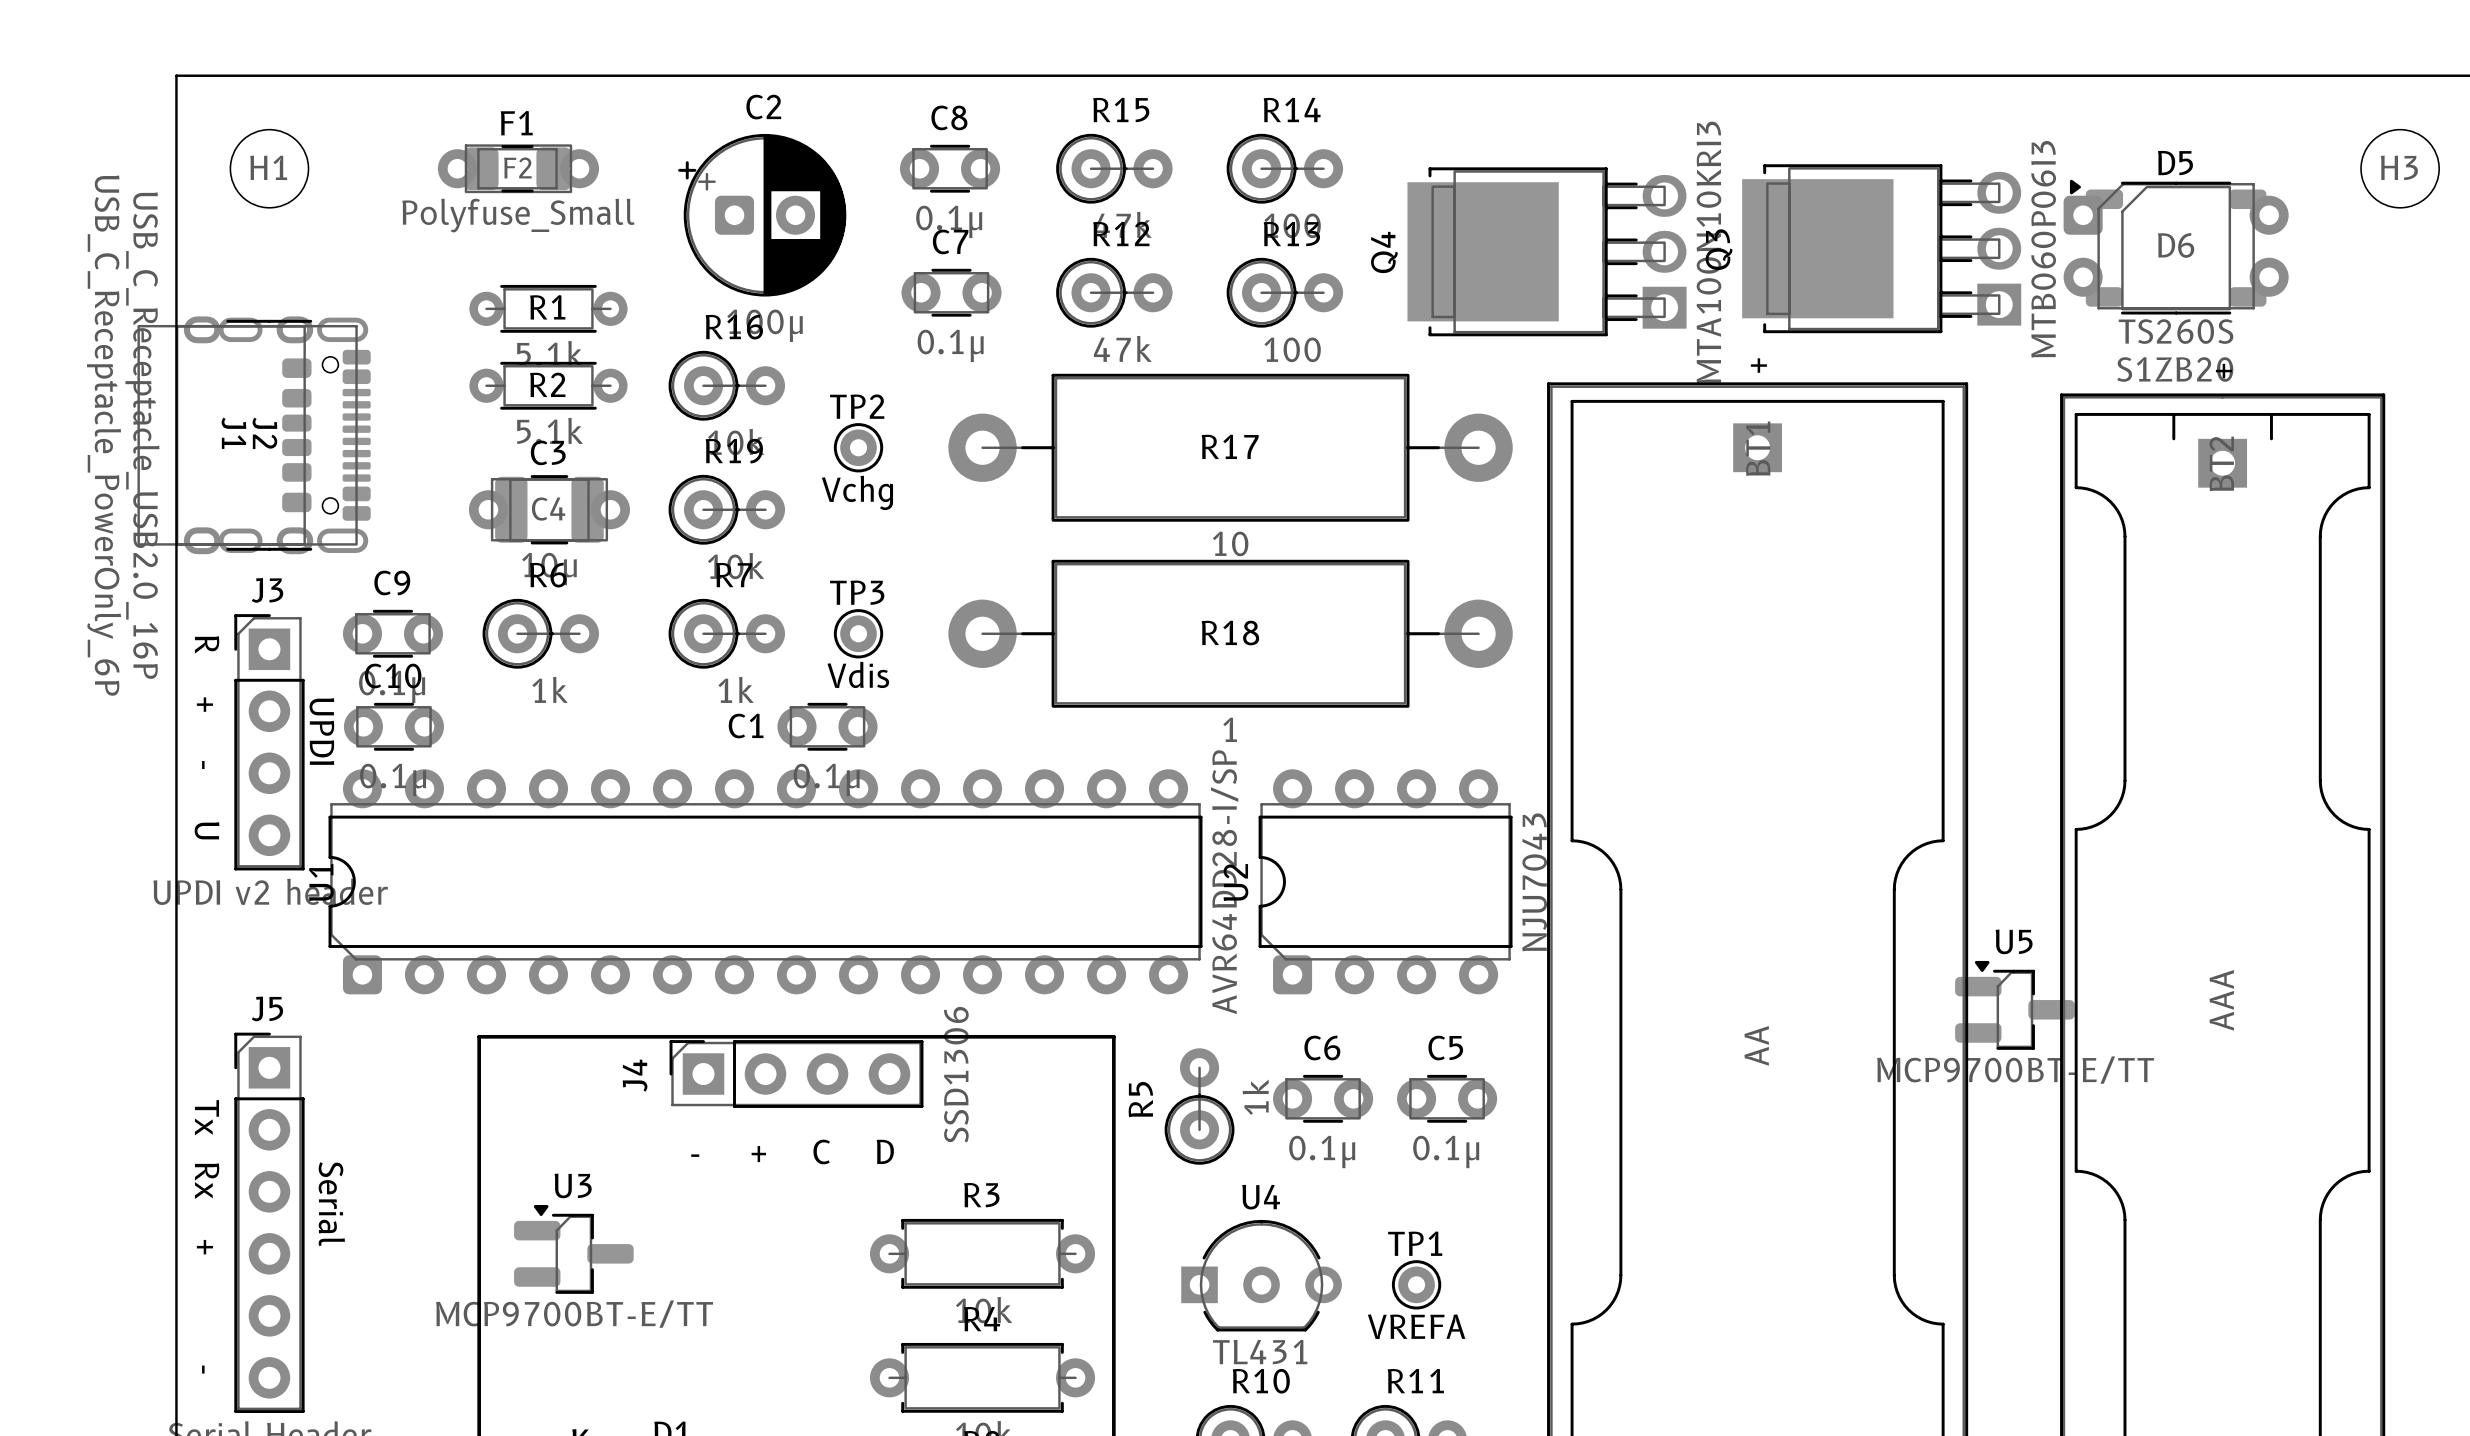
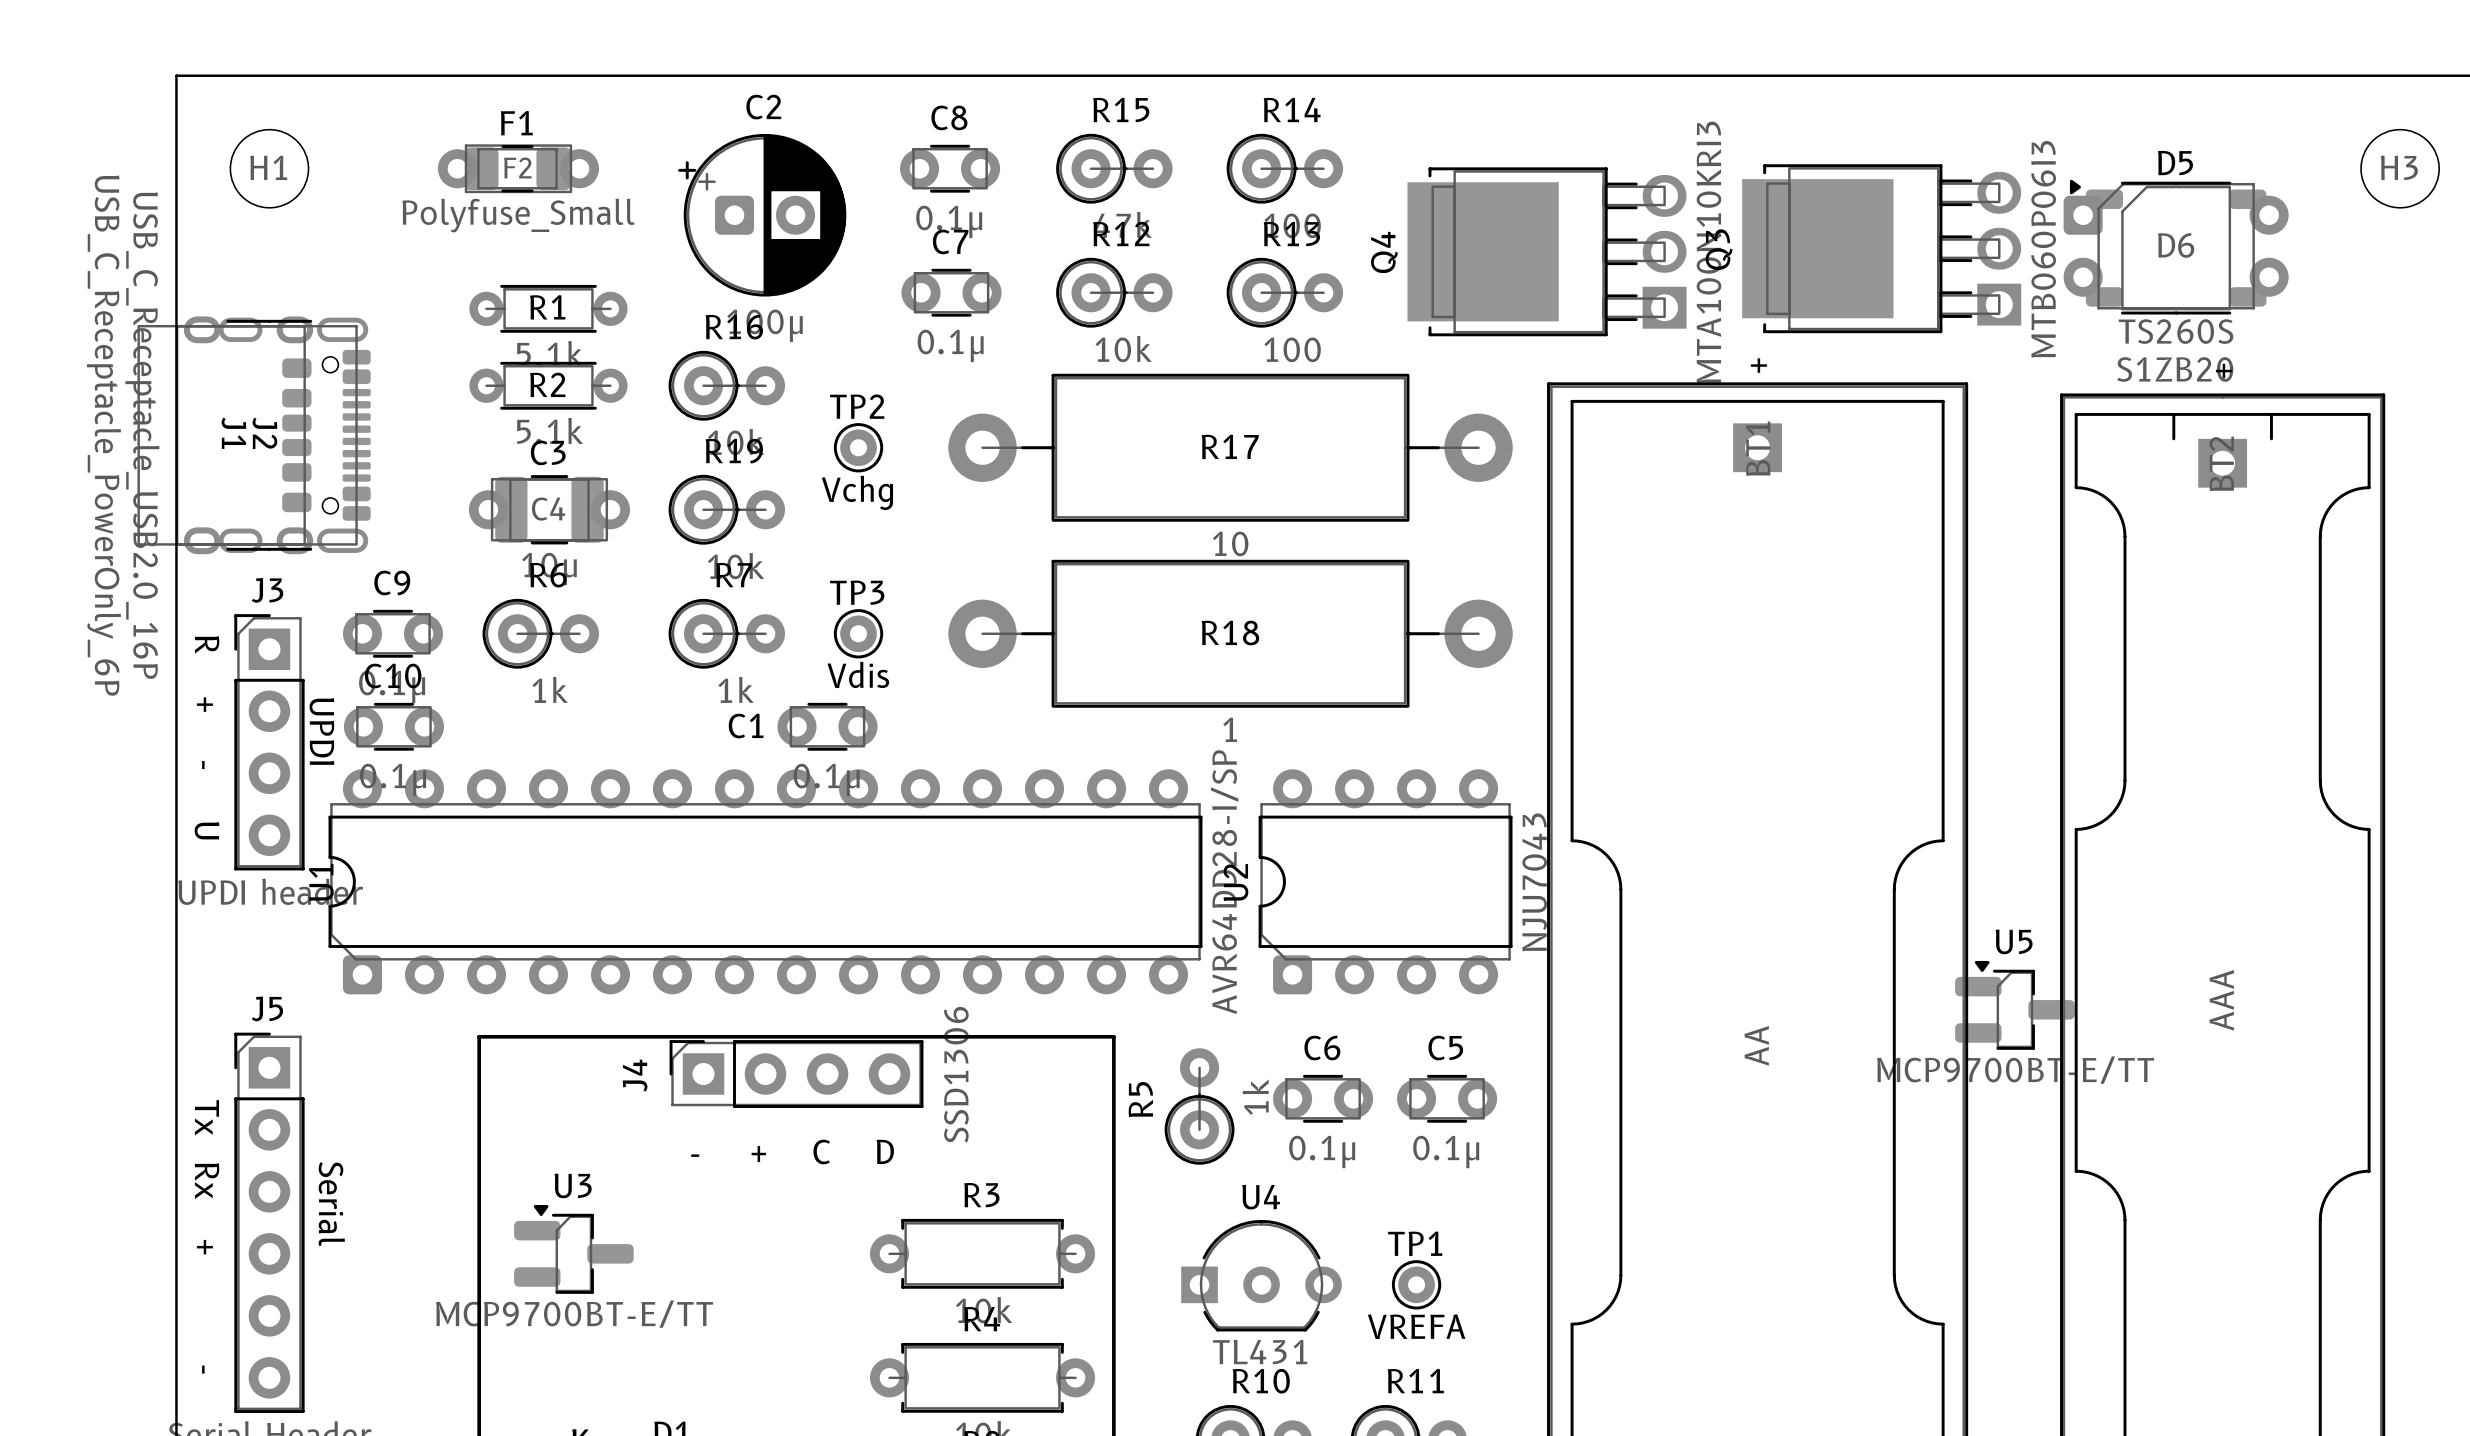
R12 value: 47k (1122, 348) -> 10k (1123, 349)
J3 value: UPDI v2 header (270, 891) -> UPDI header (270, 891)

